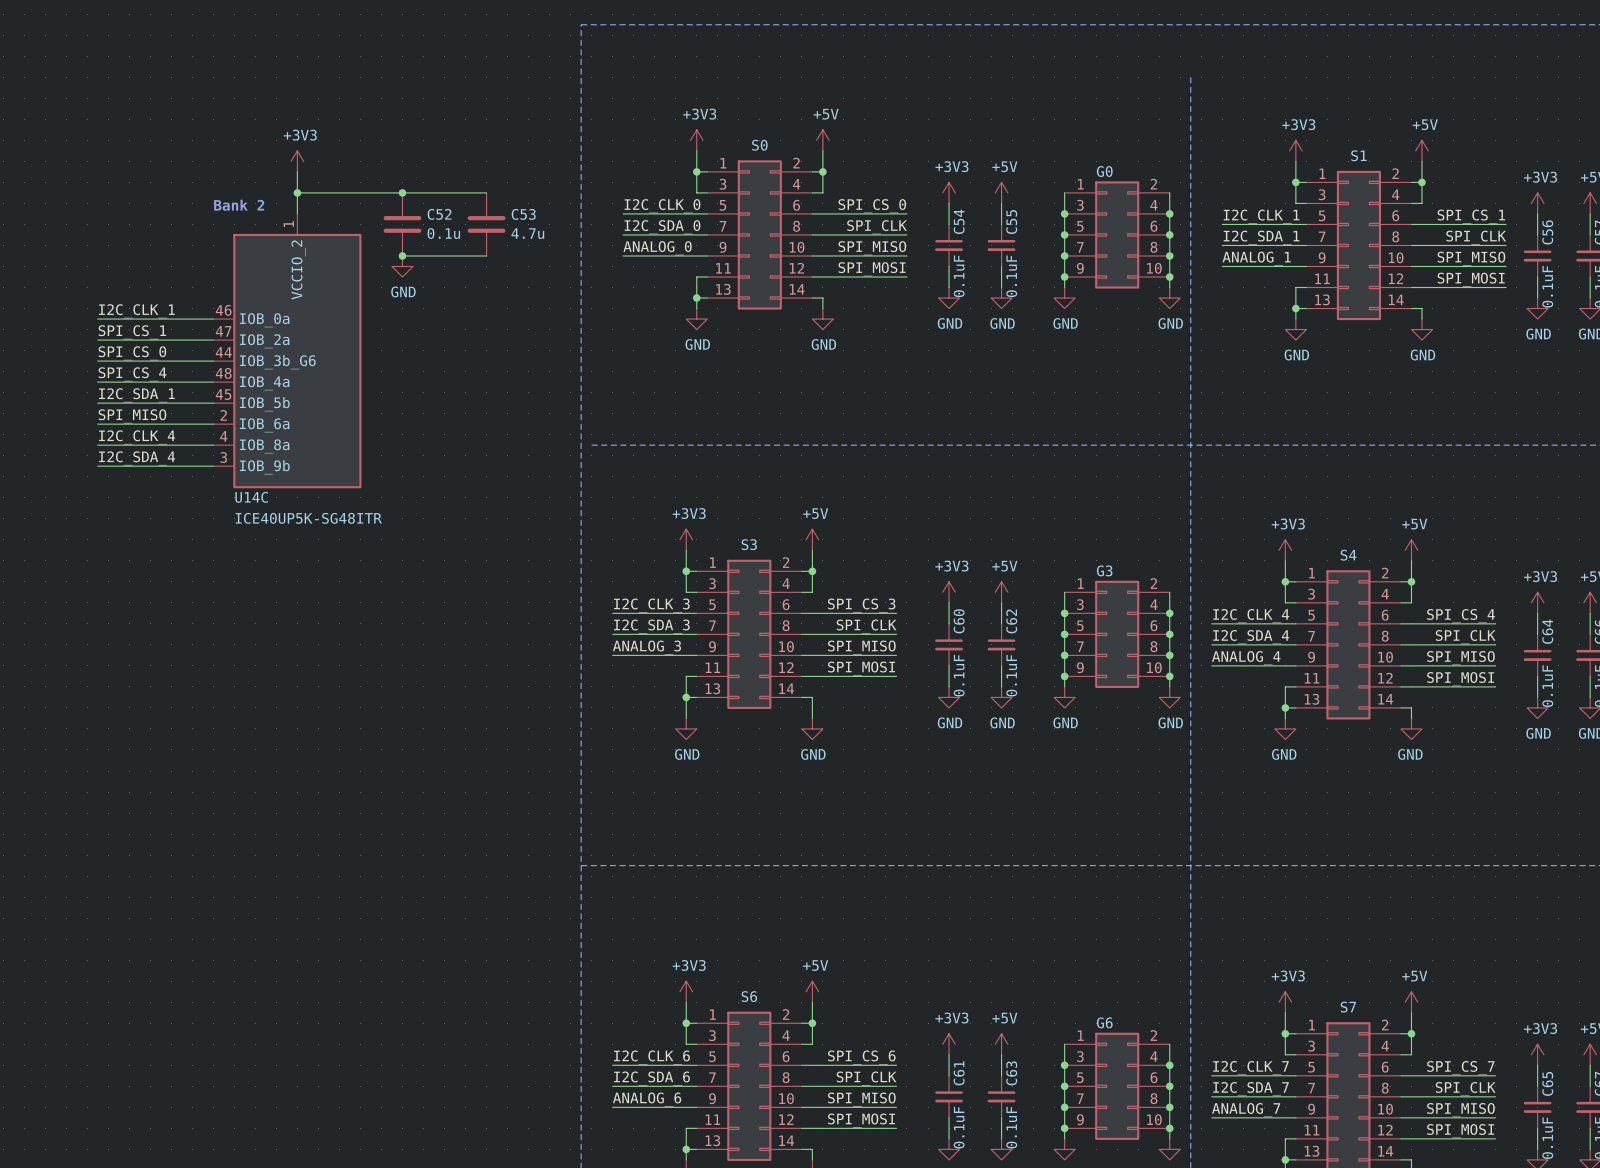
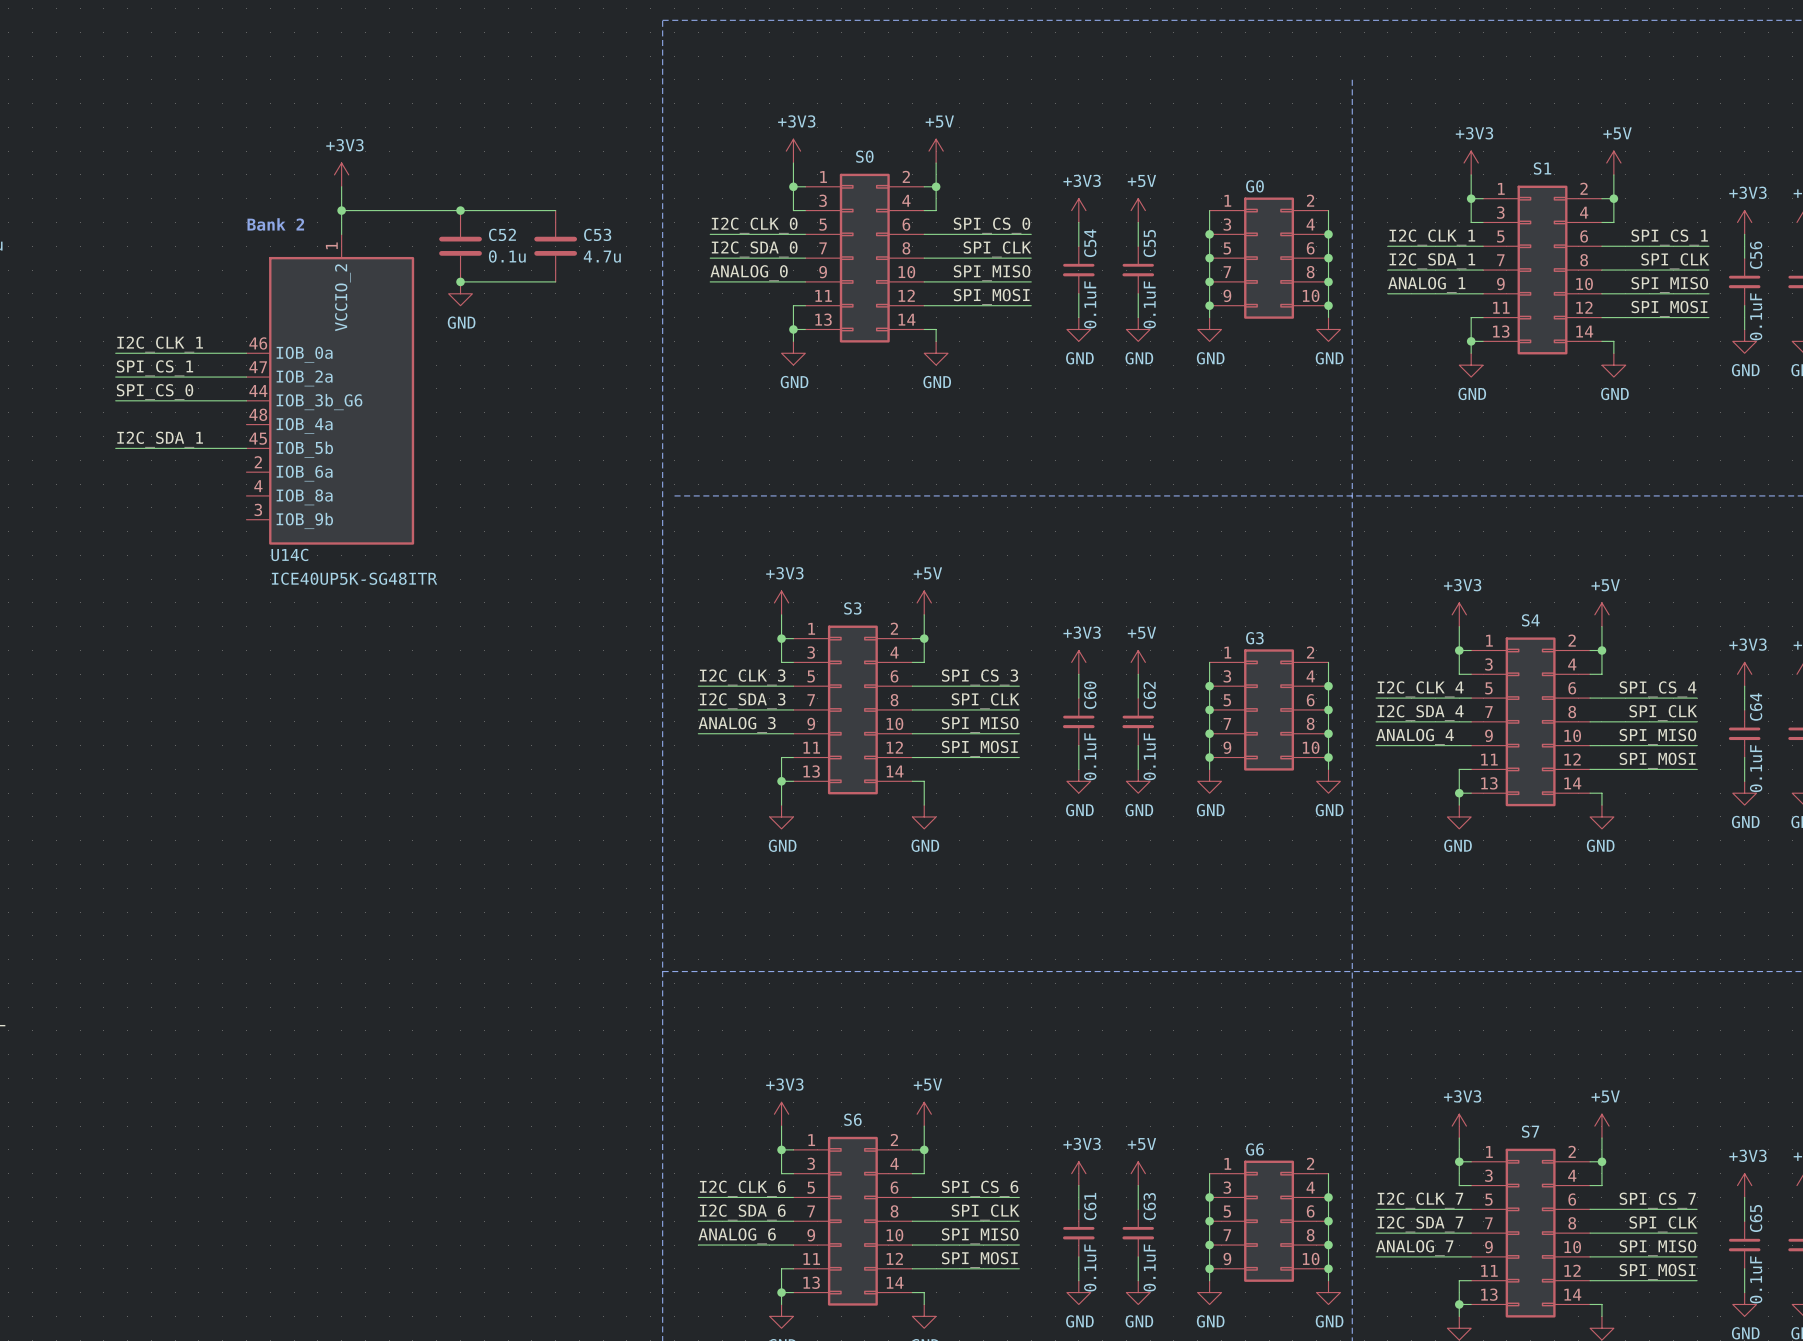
label: SPI_CS_4 (132, 374) -> none
wire: (97, 382) (213, 382) -> none
label: SPI_MISO (132, 416) -> none
wire: (97, 424) (213, 424) -> none
label: I2C_CLK_4 (137, 437) -> none
wire: (97, 445) (213, 445) -> none
label: I2C_SDA_4 (137, 458) -> none
wire: (97, 466) (213, 466) -> none

